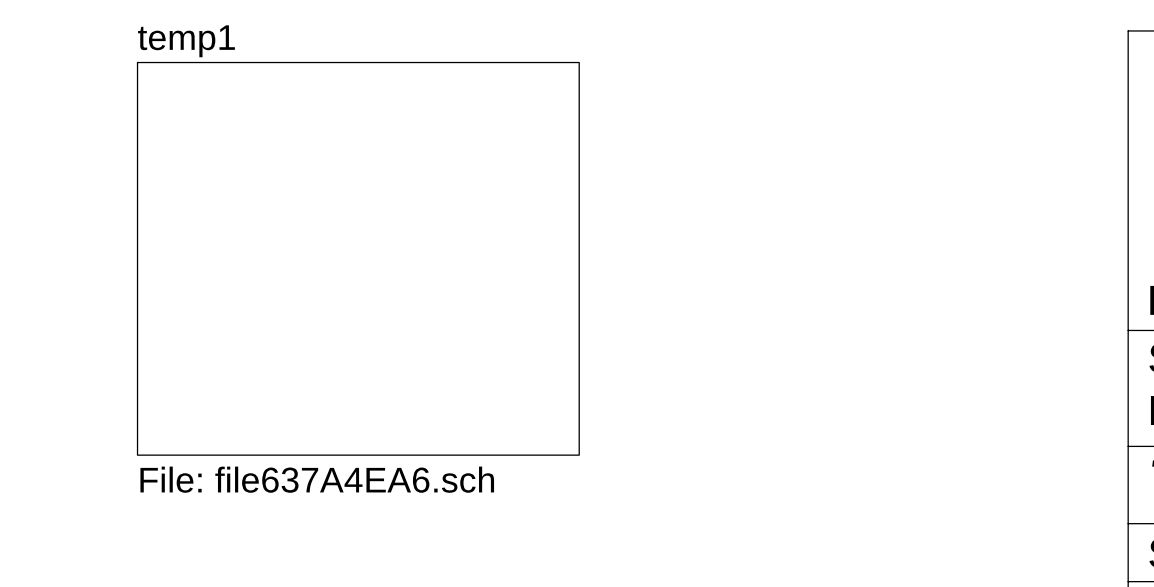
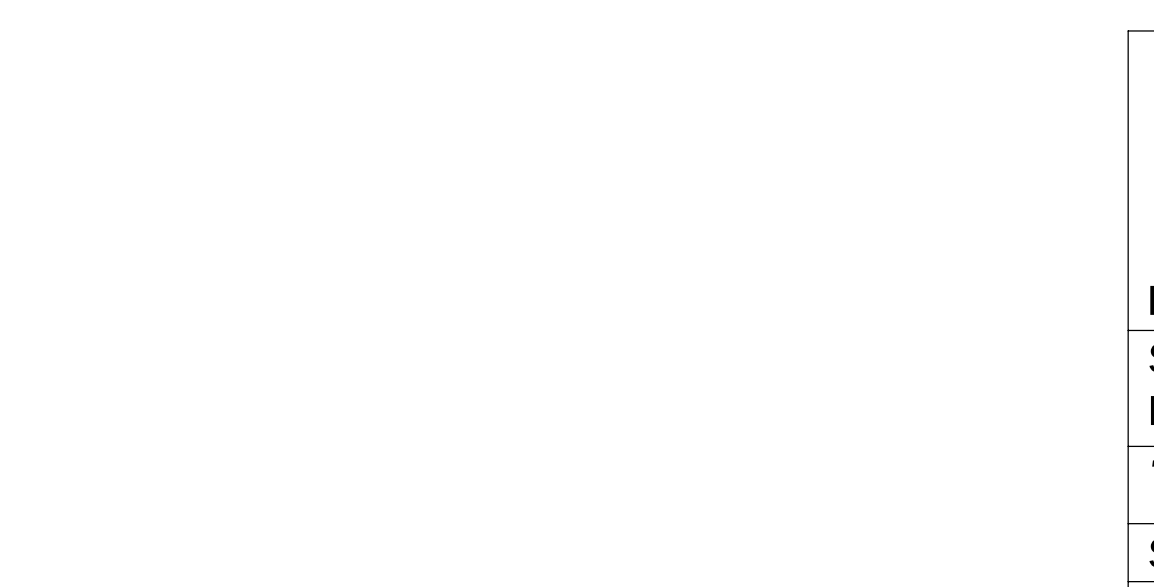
sheet temp1: File: file637A4EA6.sch (358, 258) -> none

